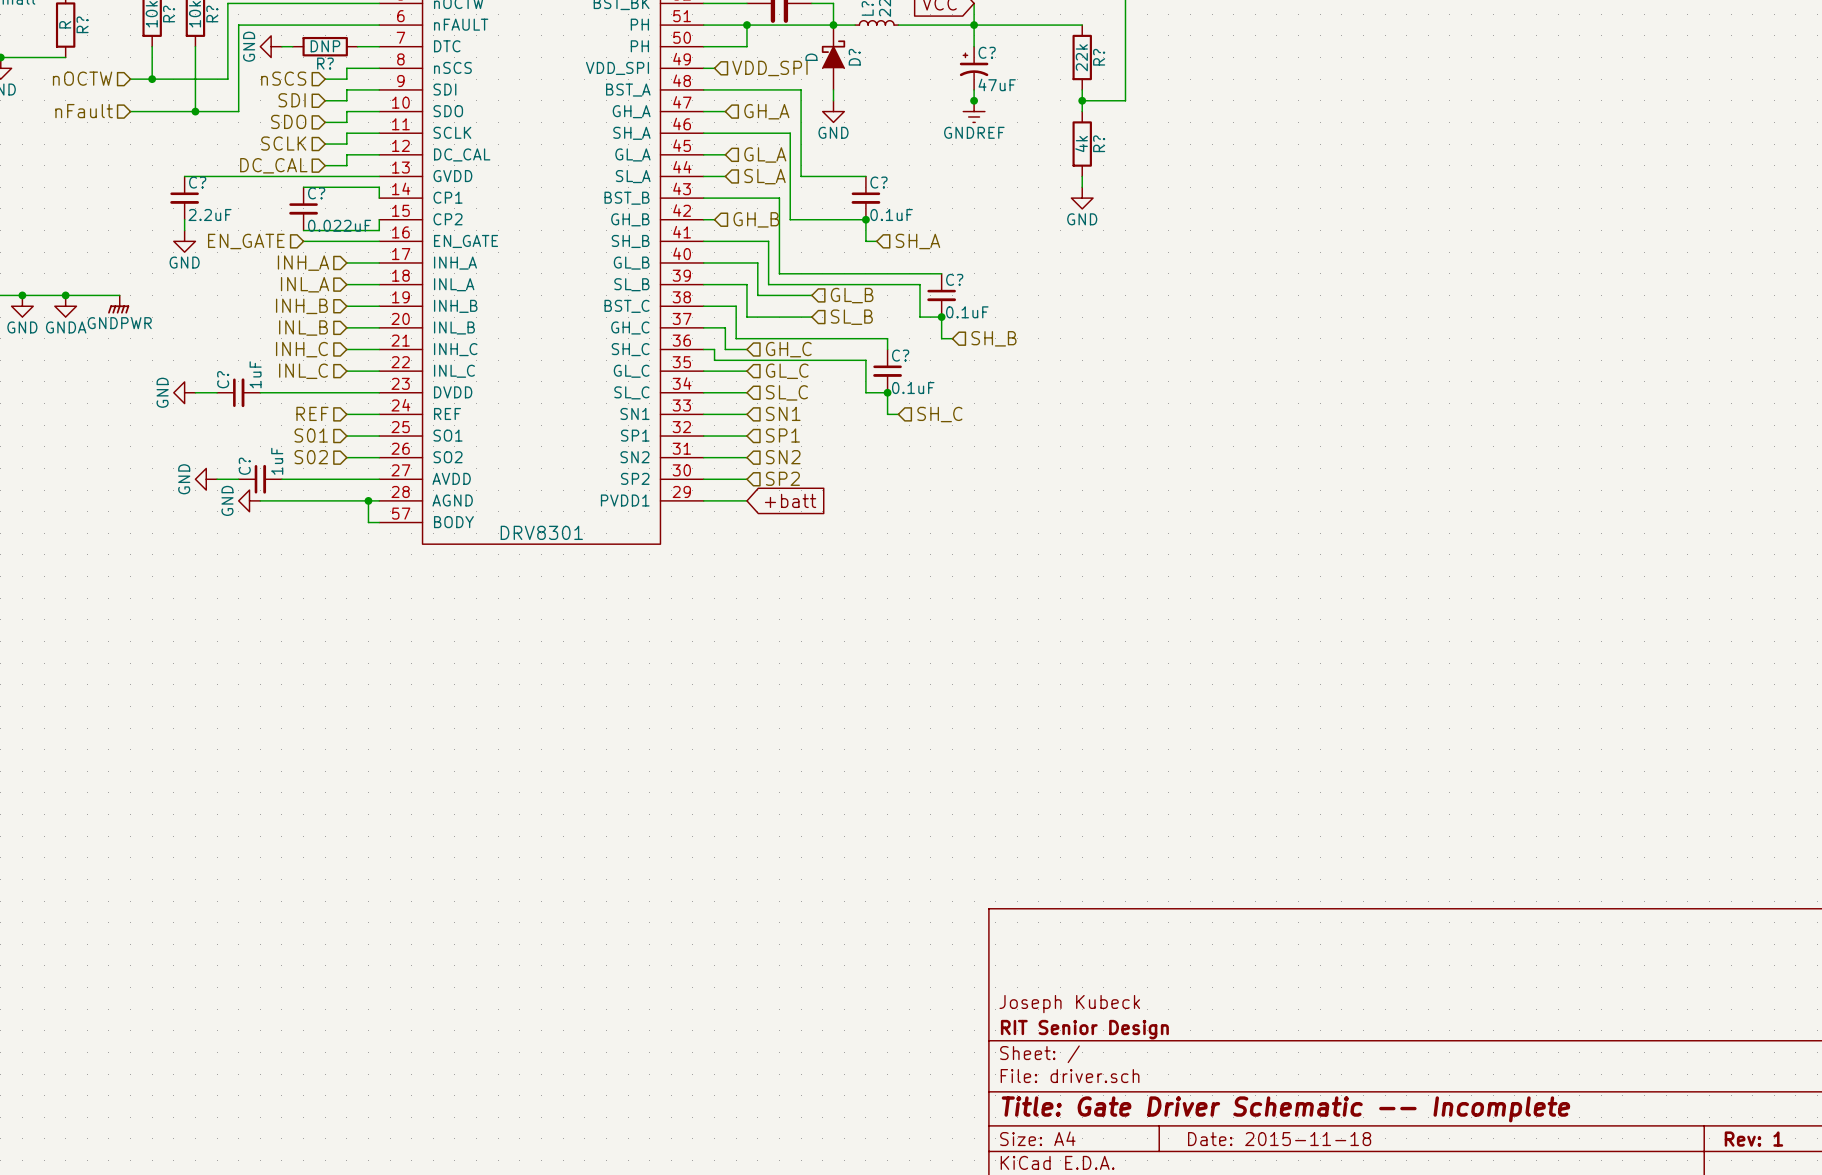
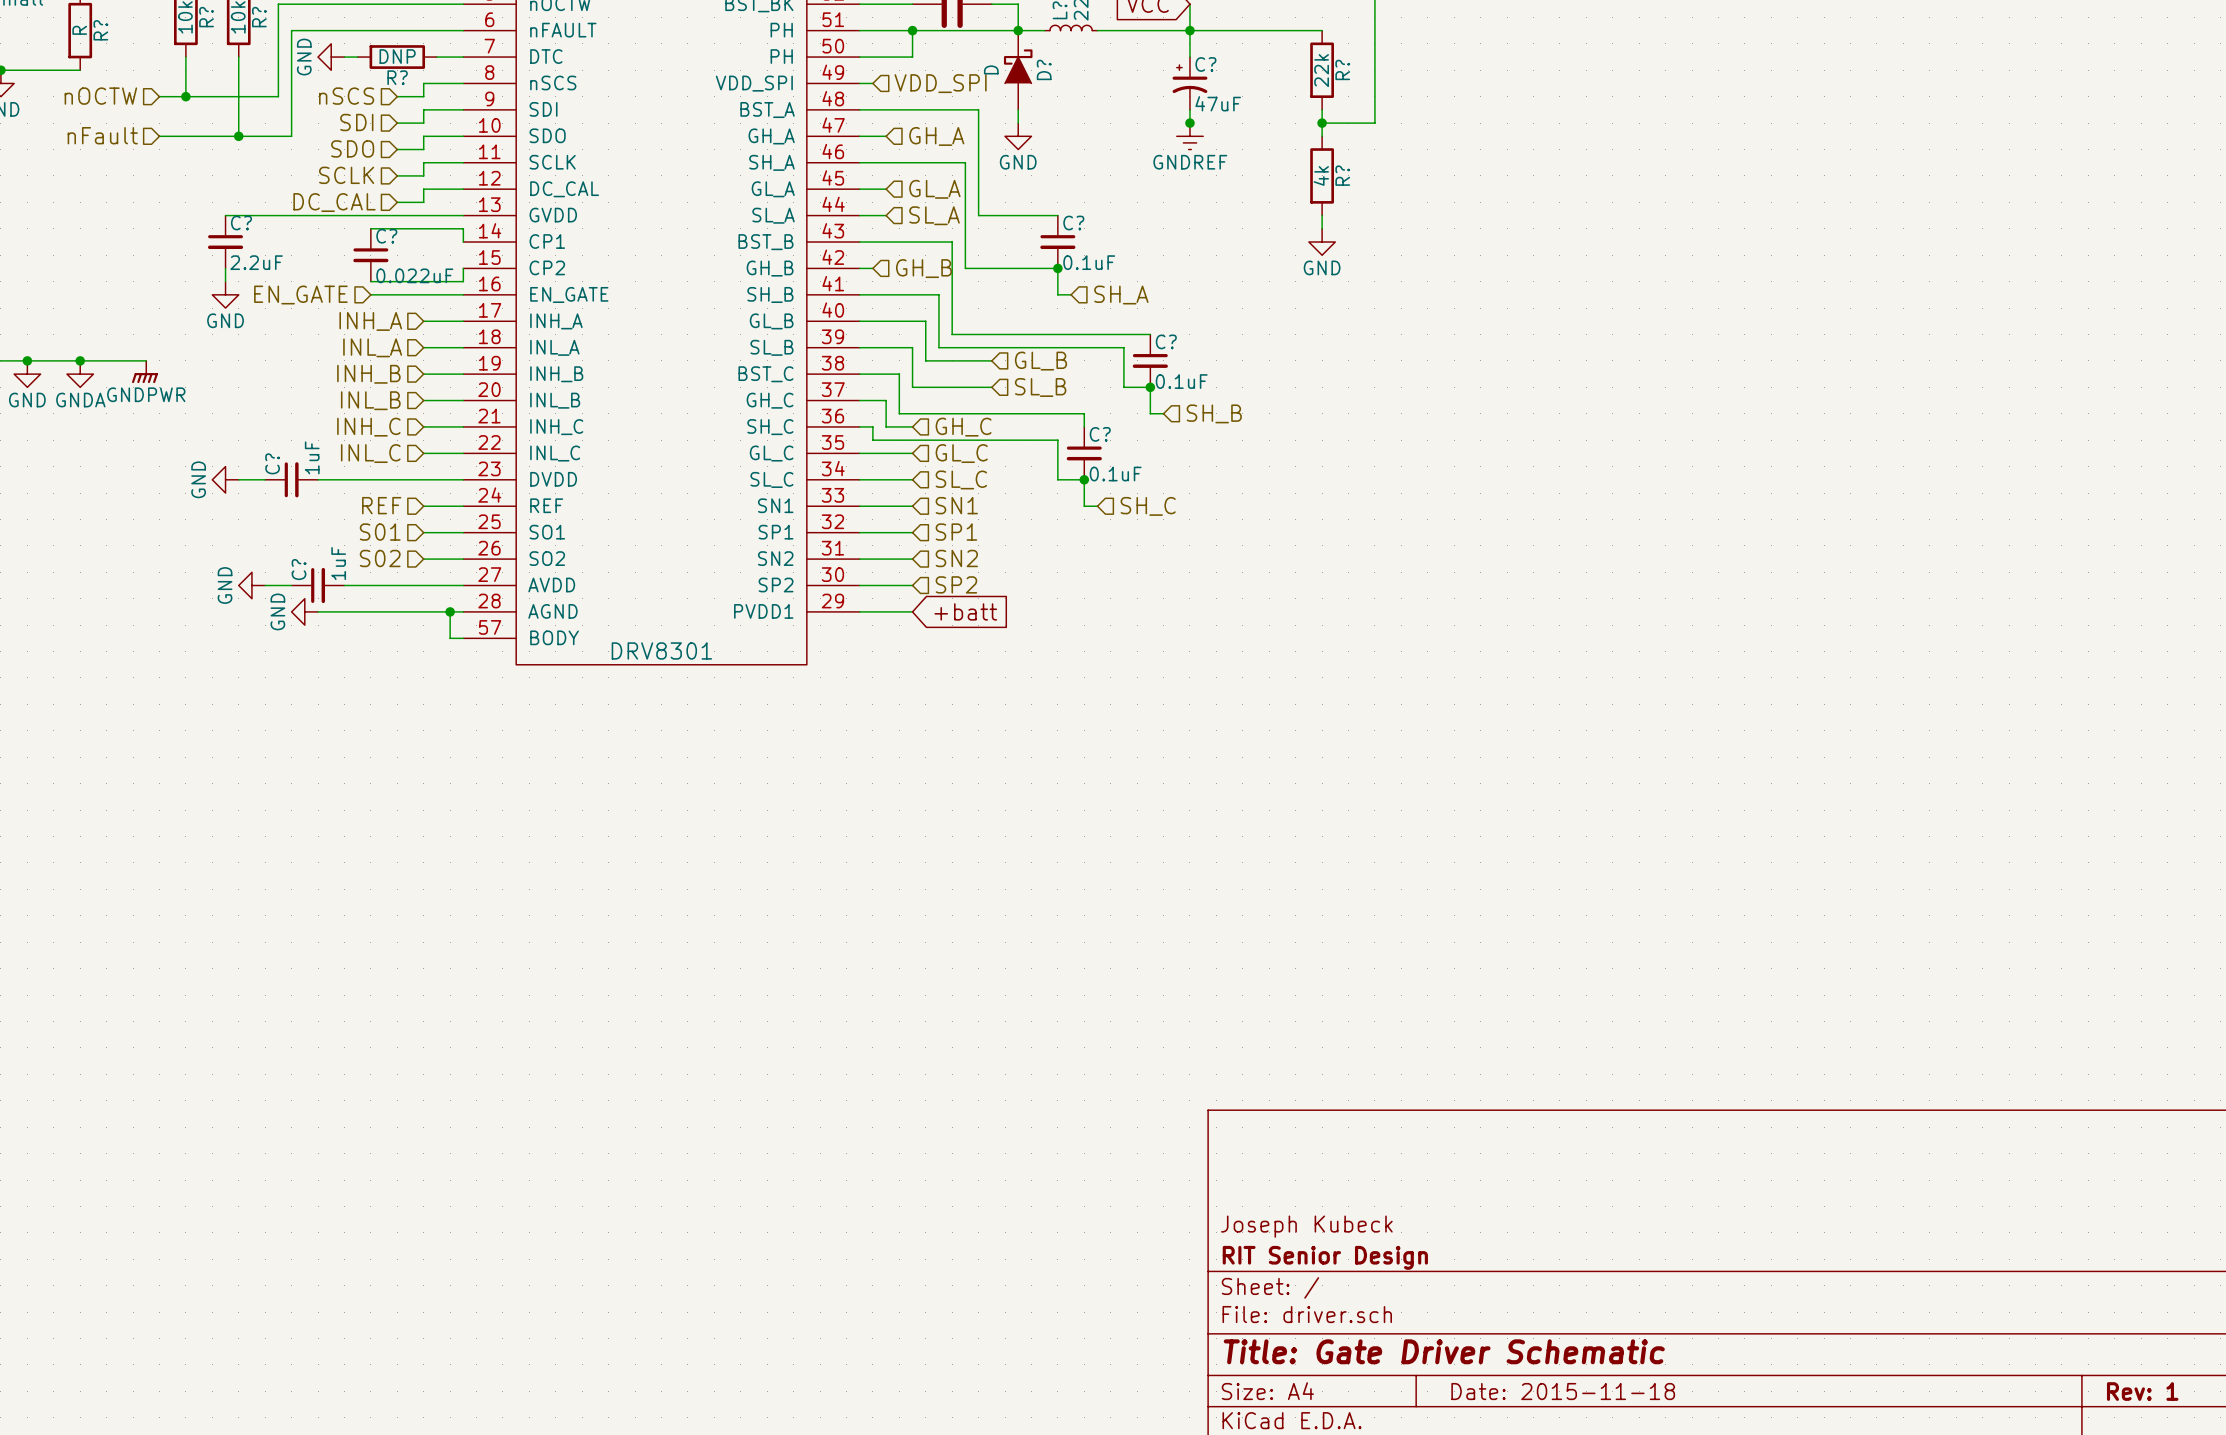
title block: Title: Gate Driver Schematic -- Incomplete (1285, 1109) -> Title: Gate Driver Schematic (1444, 1351)

